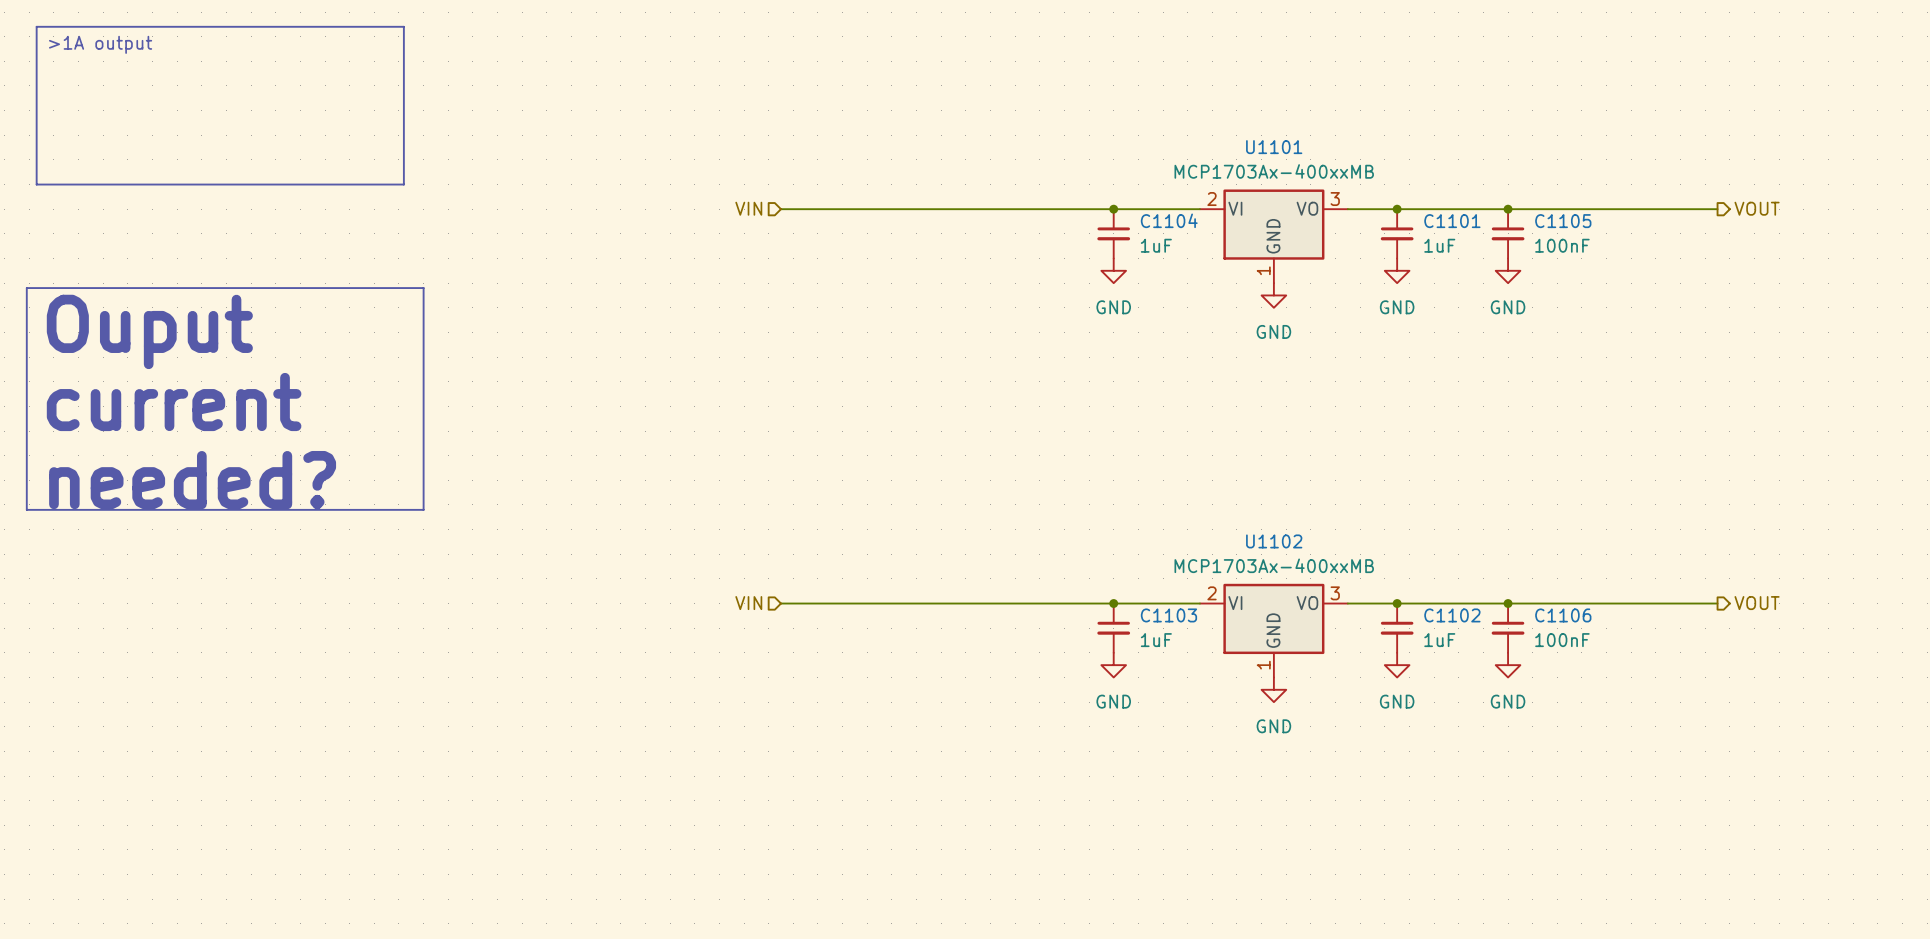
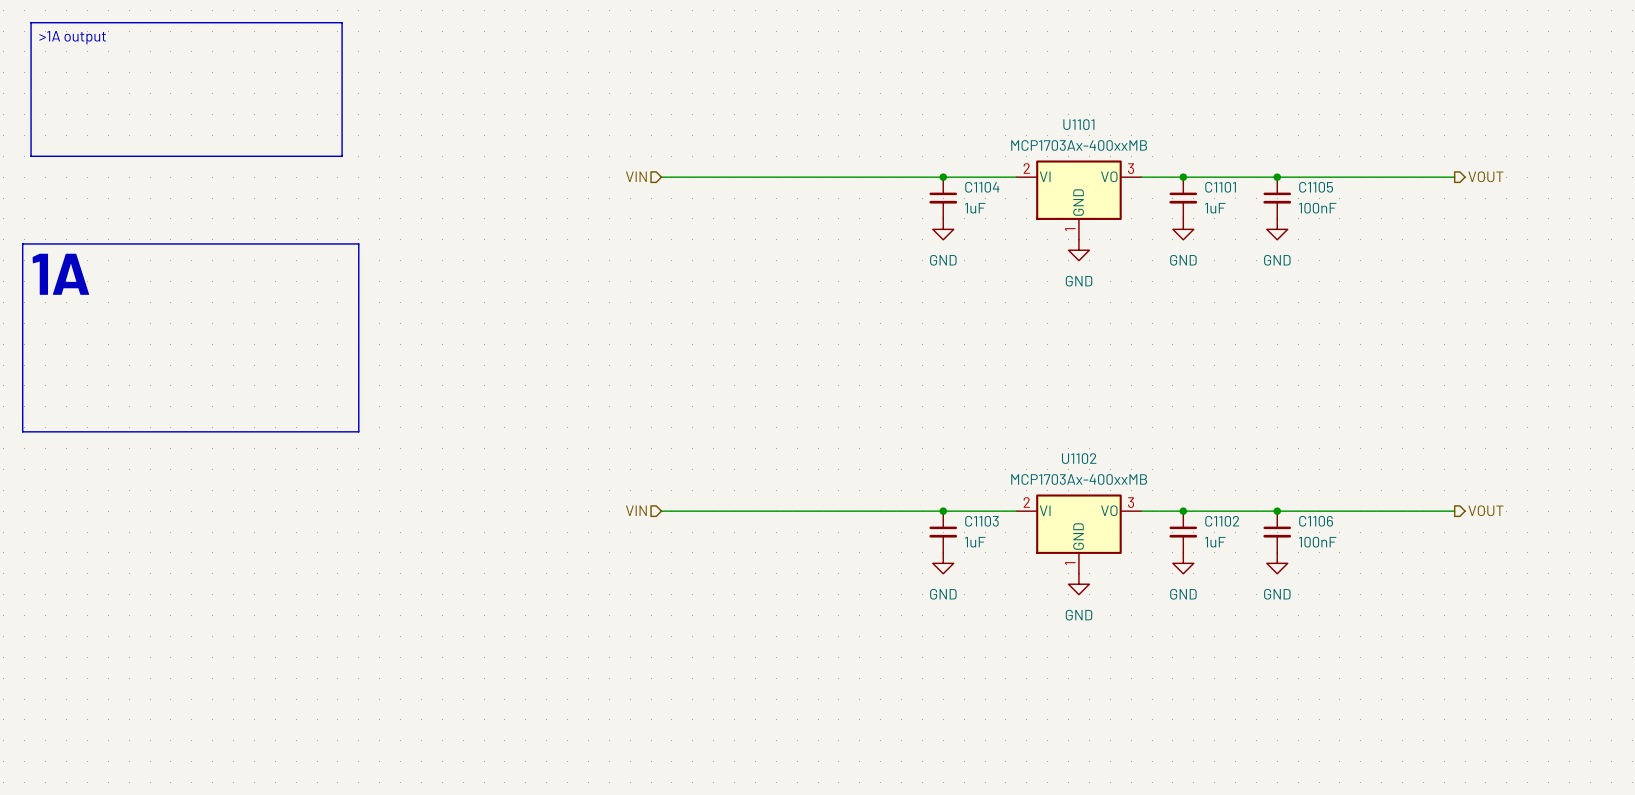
text: Ouput (149, 331) -> 1A (60, 274)
text: current (174, 401) -> none
text: needed? (192, 480) -> none

